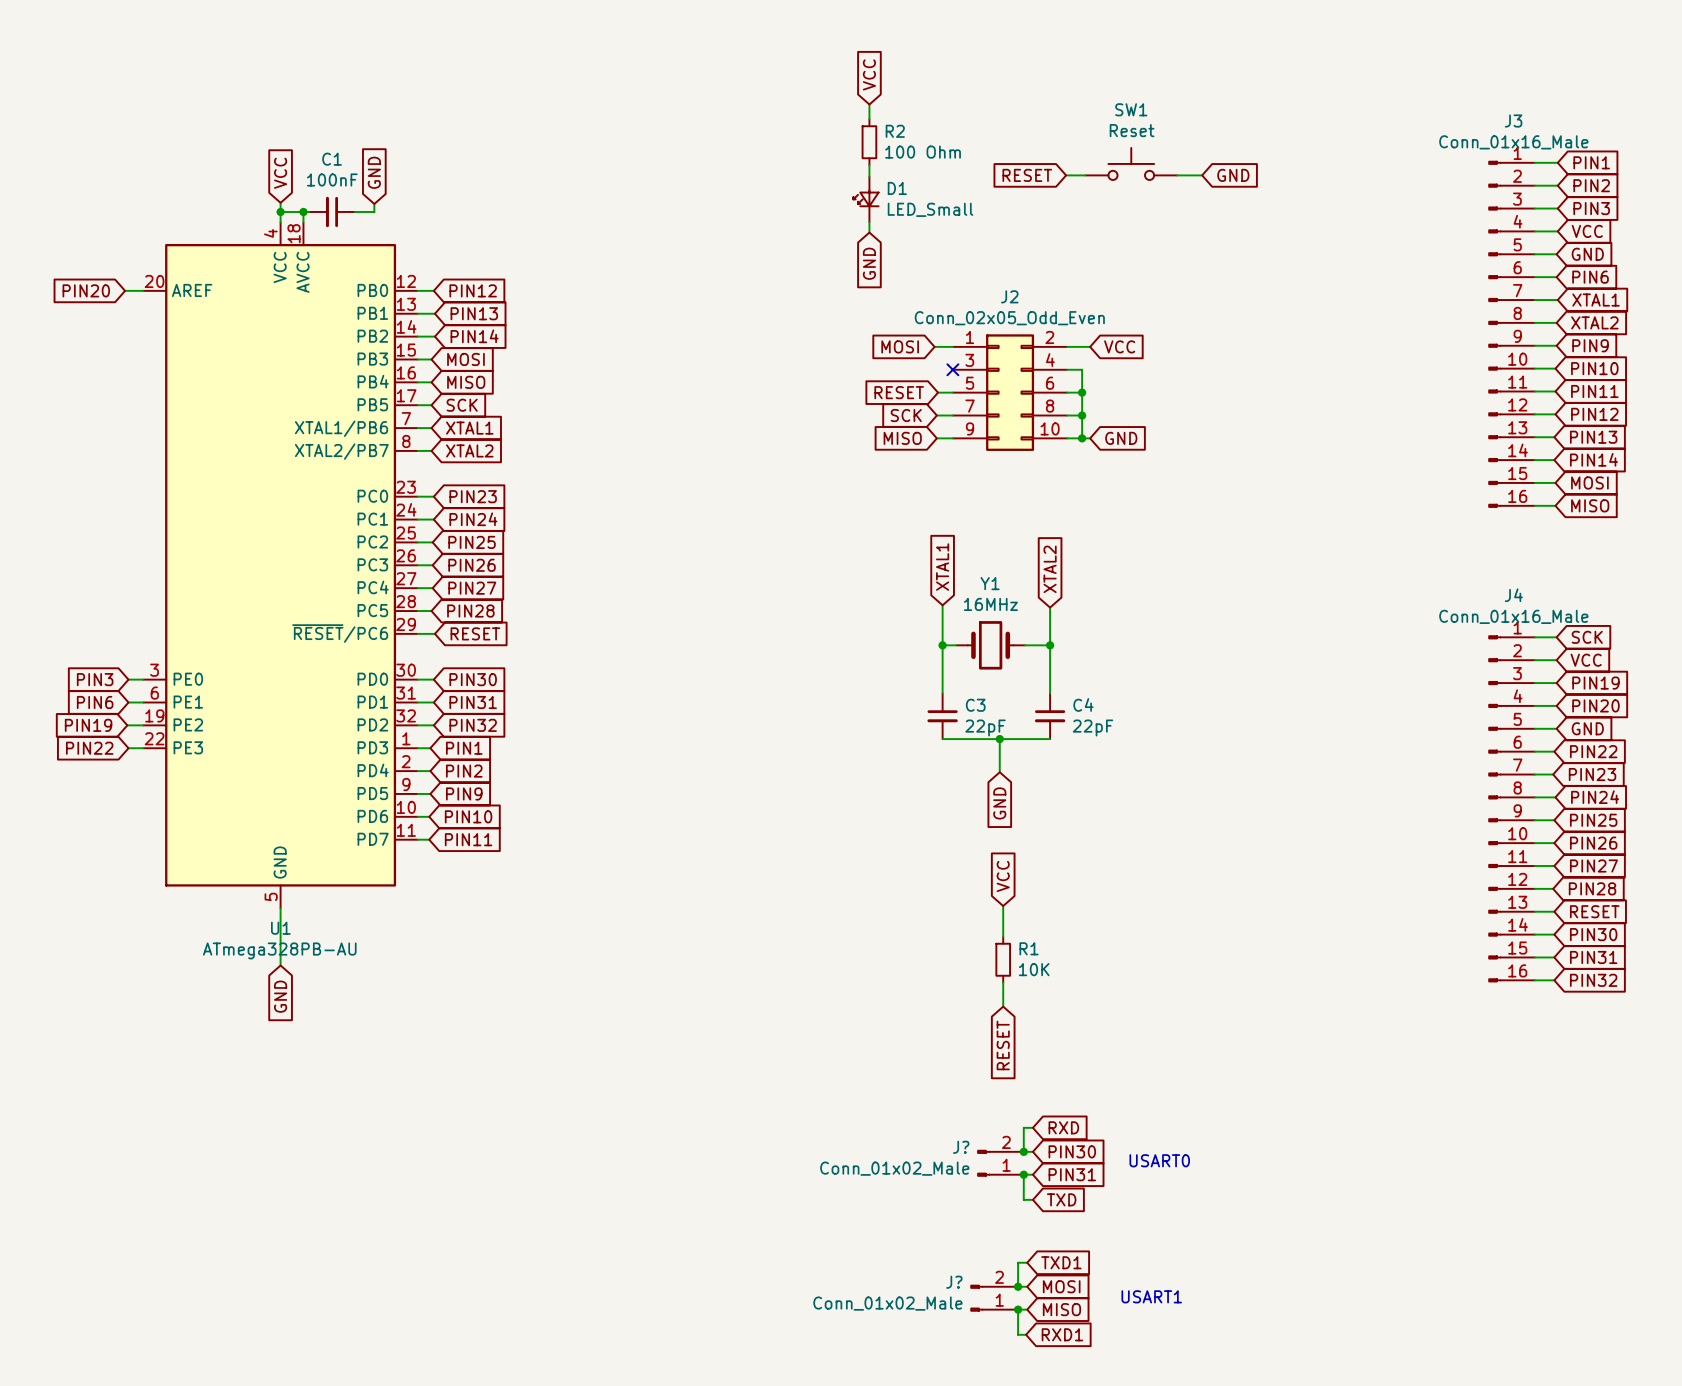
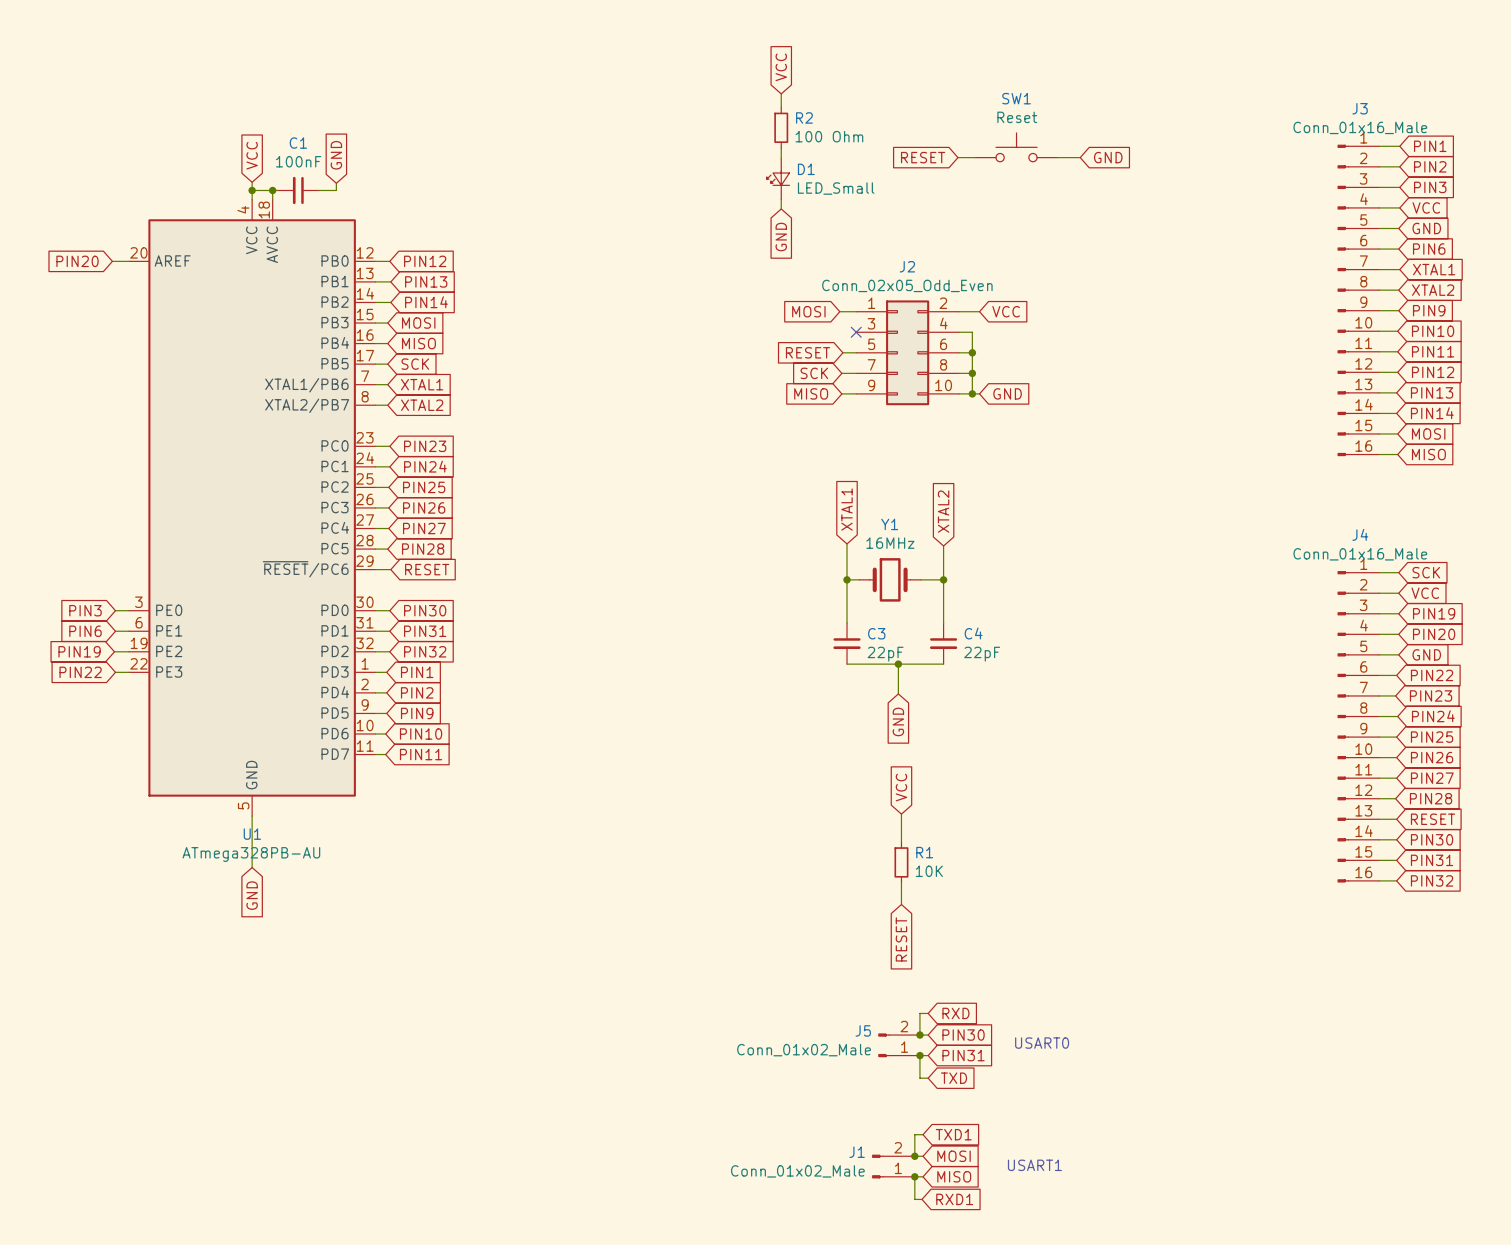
J? name: J? (961, 1147) -> J5 (863, 1030)
J? name: J? (954, 1282) -> J1 (857, 1152)

